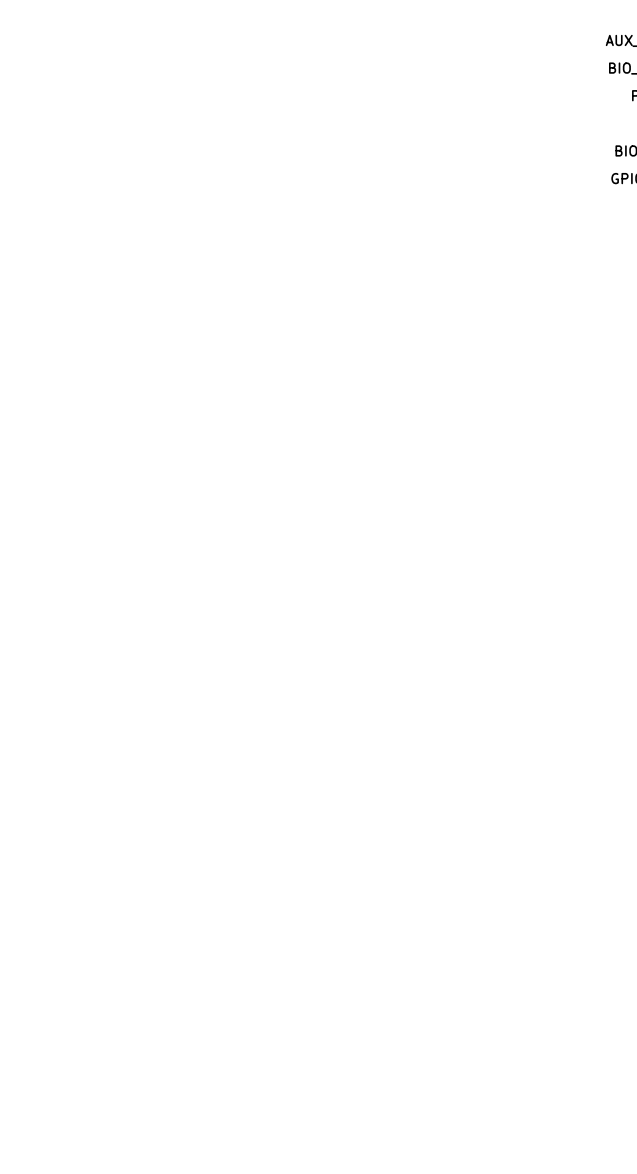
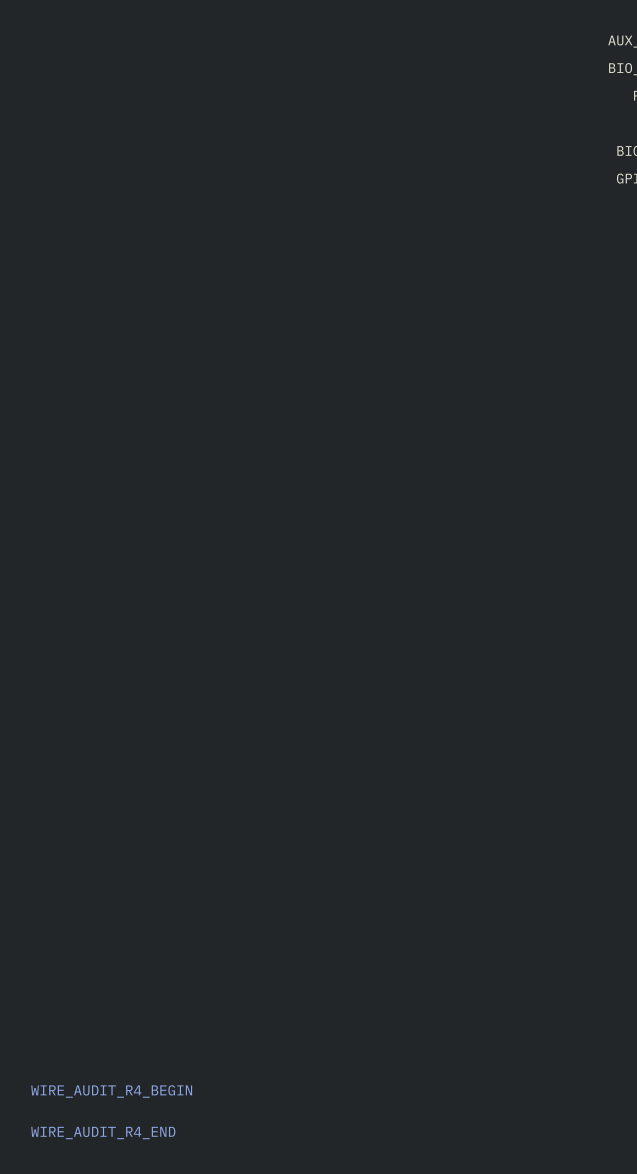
text: none -> WIRE_AUDIT_R4_BEGIN (111, 1091)
text: none -> WIRE_AUDIT_R4_END (103, 1133)

